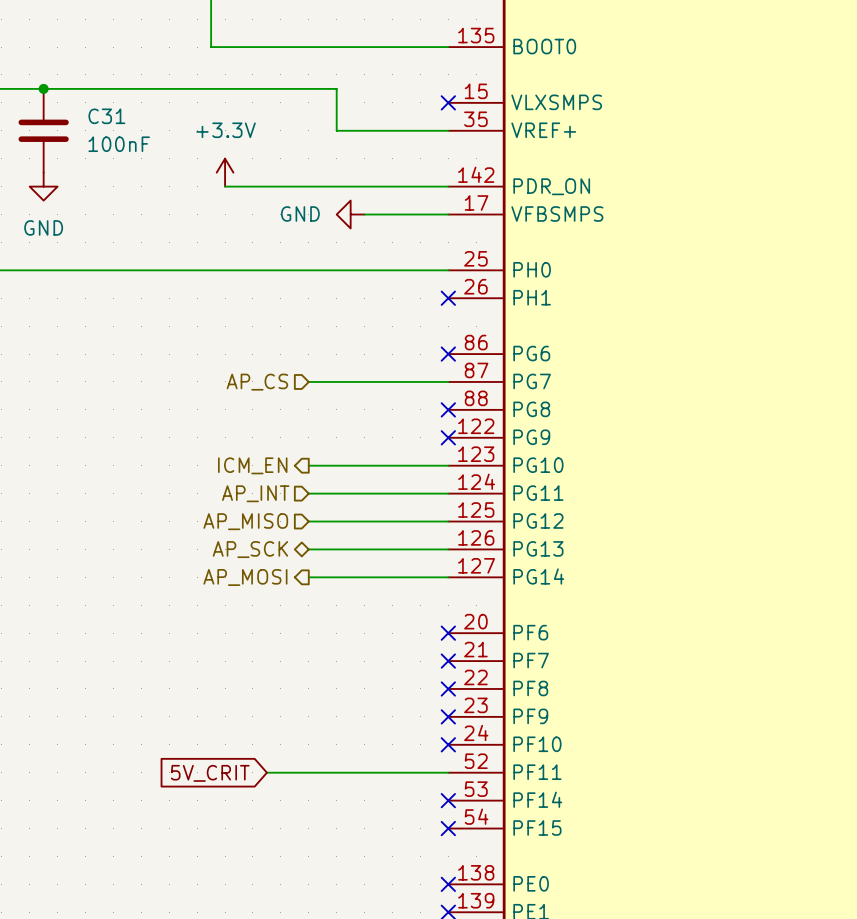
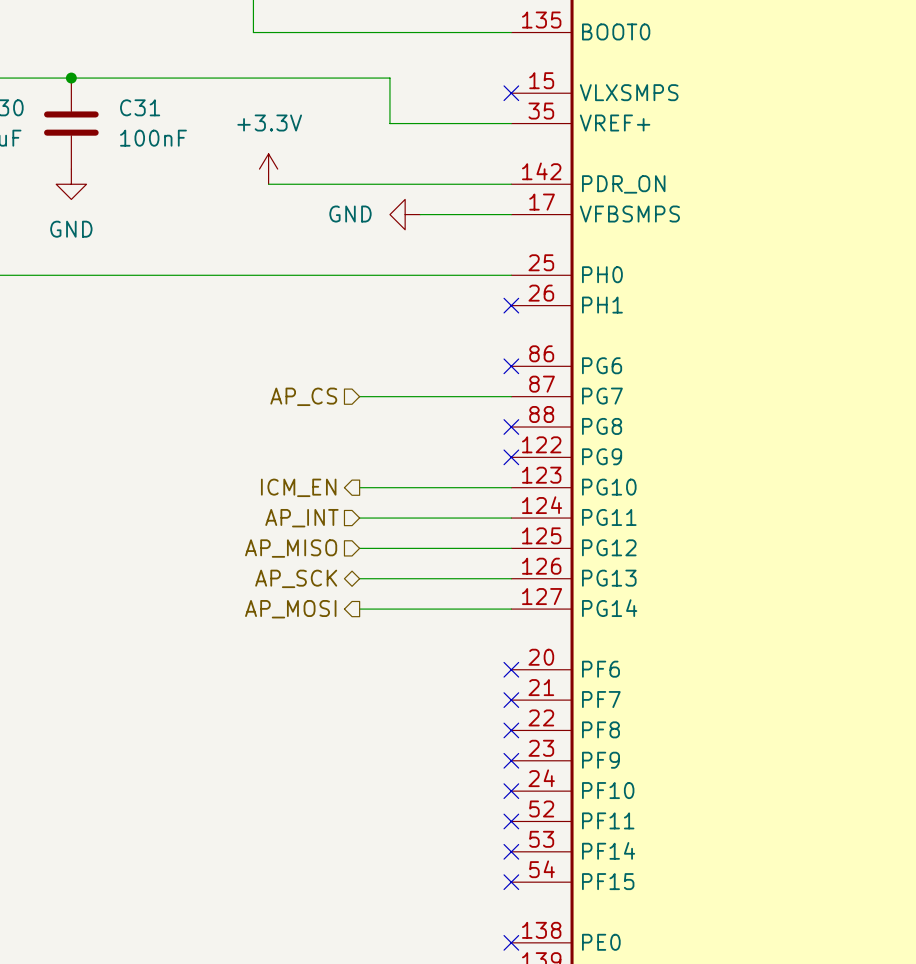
wire: (266, 772) (448, 772) -> none
no-connect mark: none -> (511, 821)
global label: 5V_CRIT (210, 773) -> none

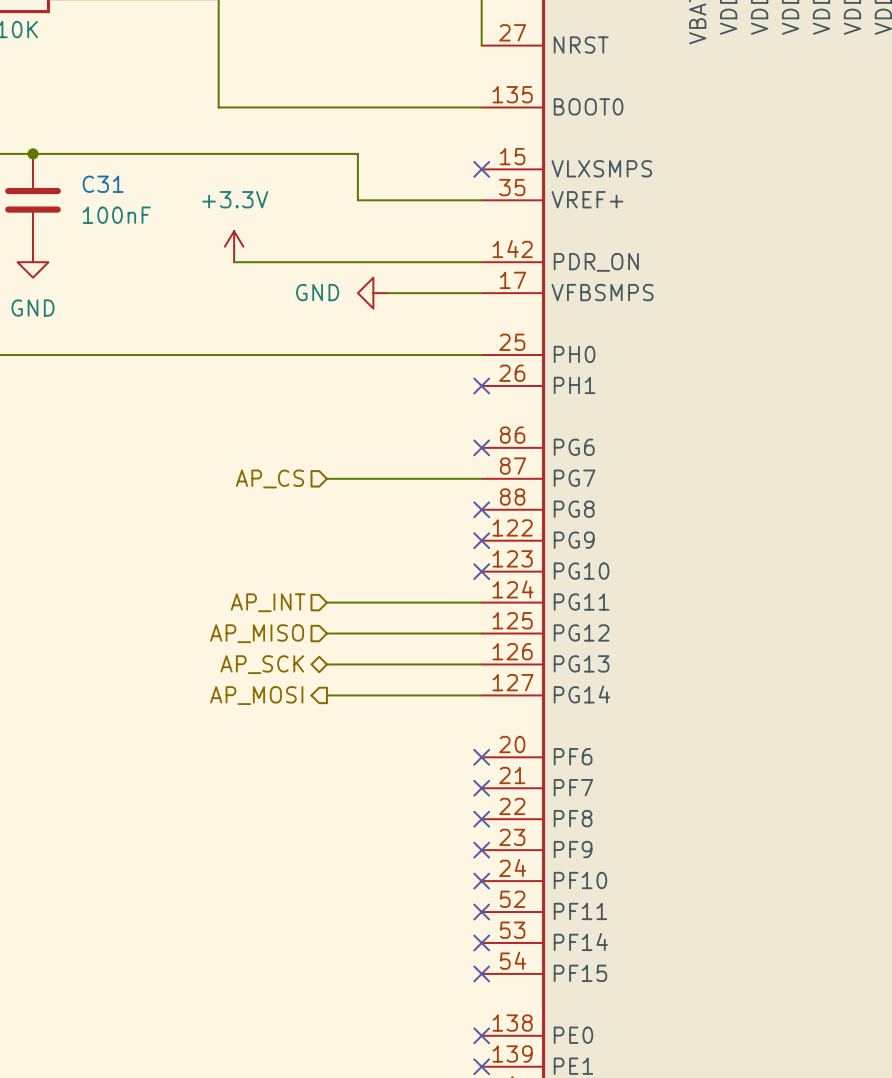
hierarchical label: ICM_EN (298, 487) -> none
wire: (359, 487) (511, 487) -> none
no-connect mark: none -> (481, 571)

